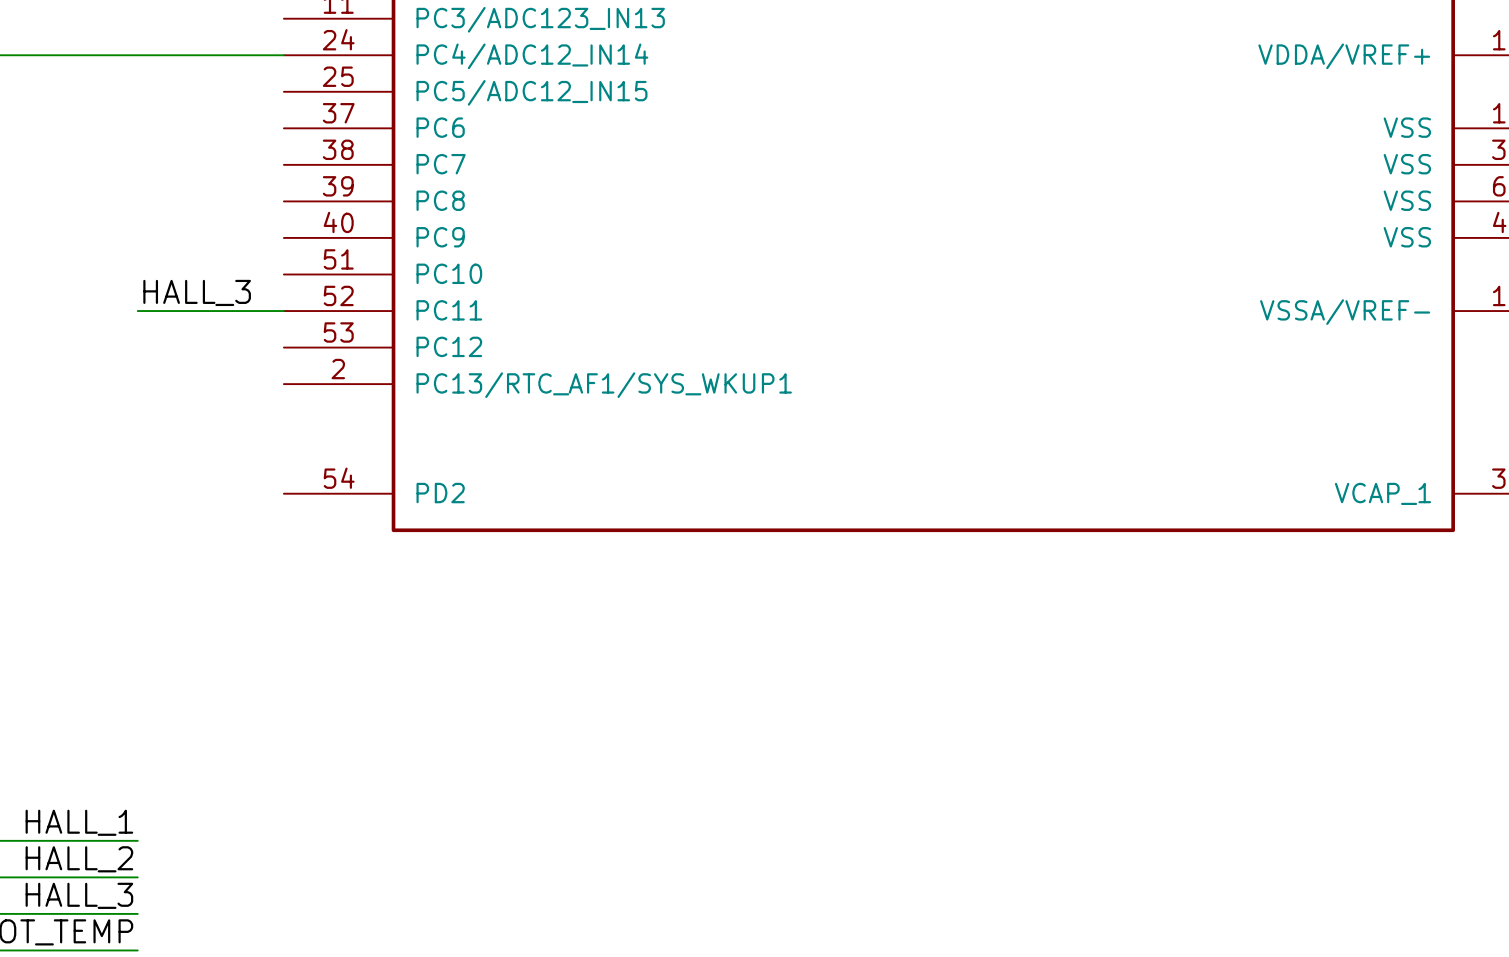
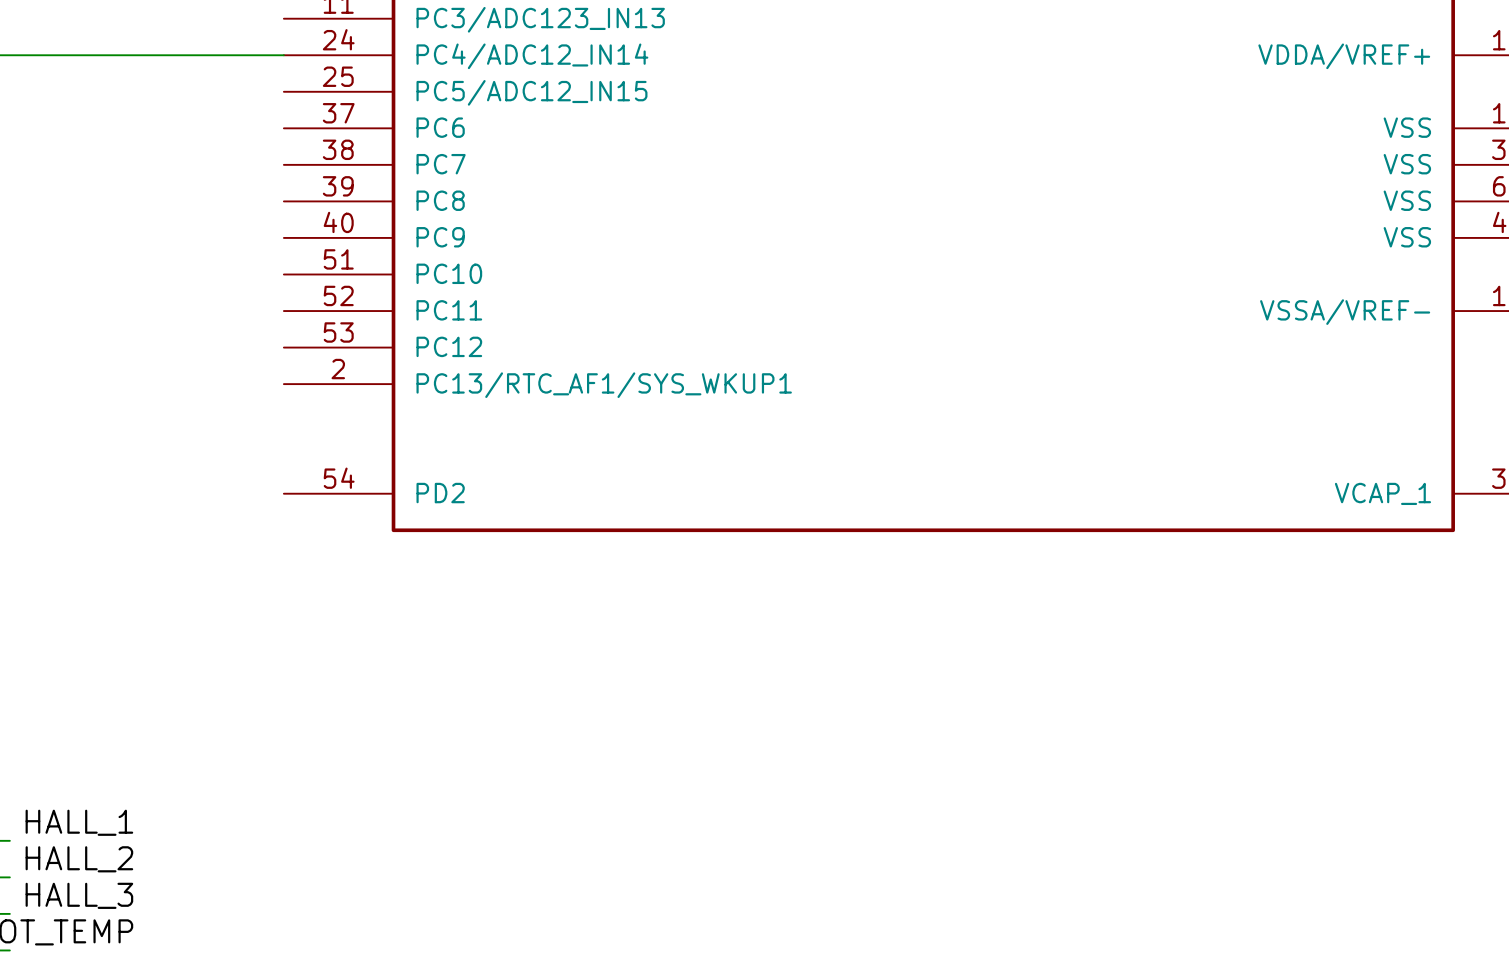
label: HALL_3 (197, 292) -> none
wire: (137, 311) (283, 311) -> none
wire: (9, 840) (137, 840) -> none
wire: (9, 877) (137, 877) -> none
wire: (9, 913) (137, 913) -> none
wire: (9, 950) (137, 950) -> none

